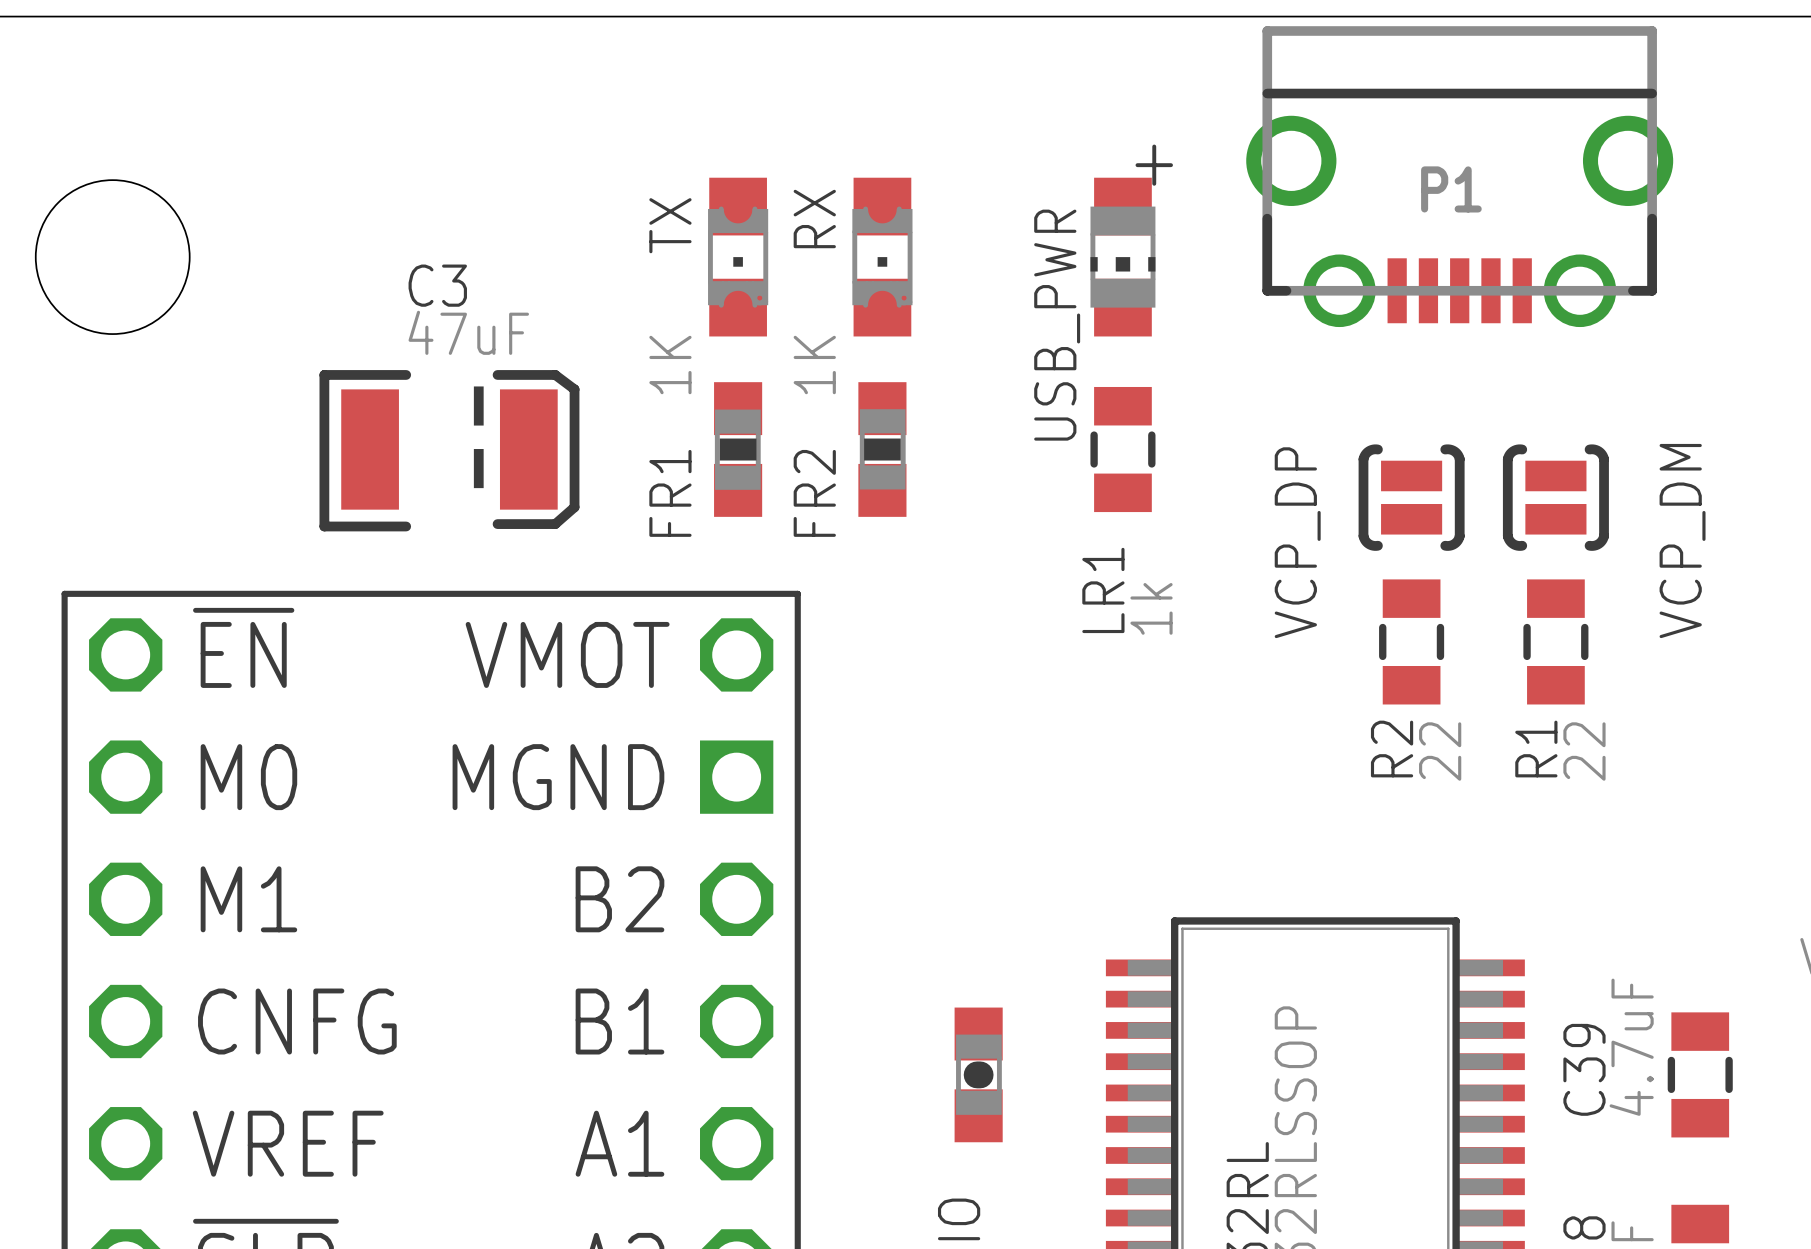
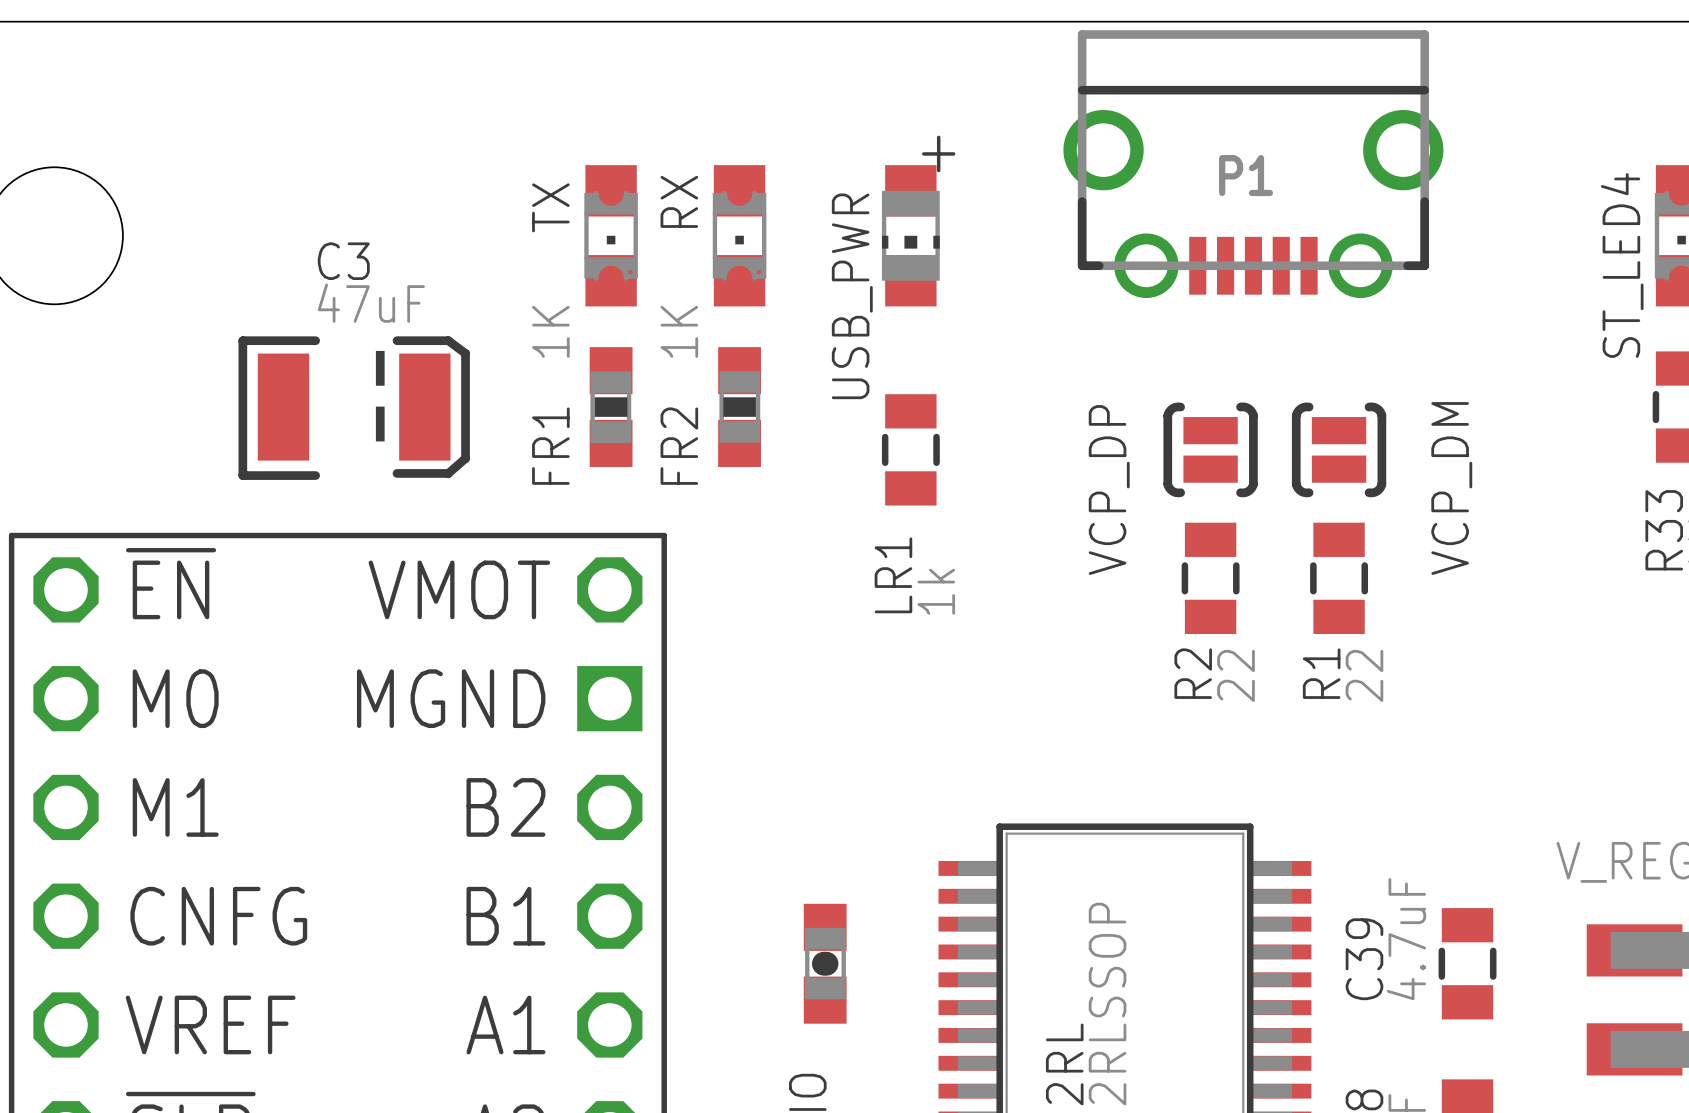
USB_PWR position: (1122, 257) -> (910, 235)
LR1 position: (1122, 449) -> (910, 449)

